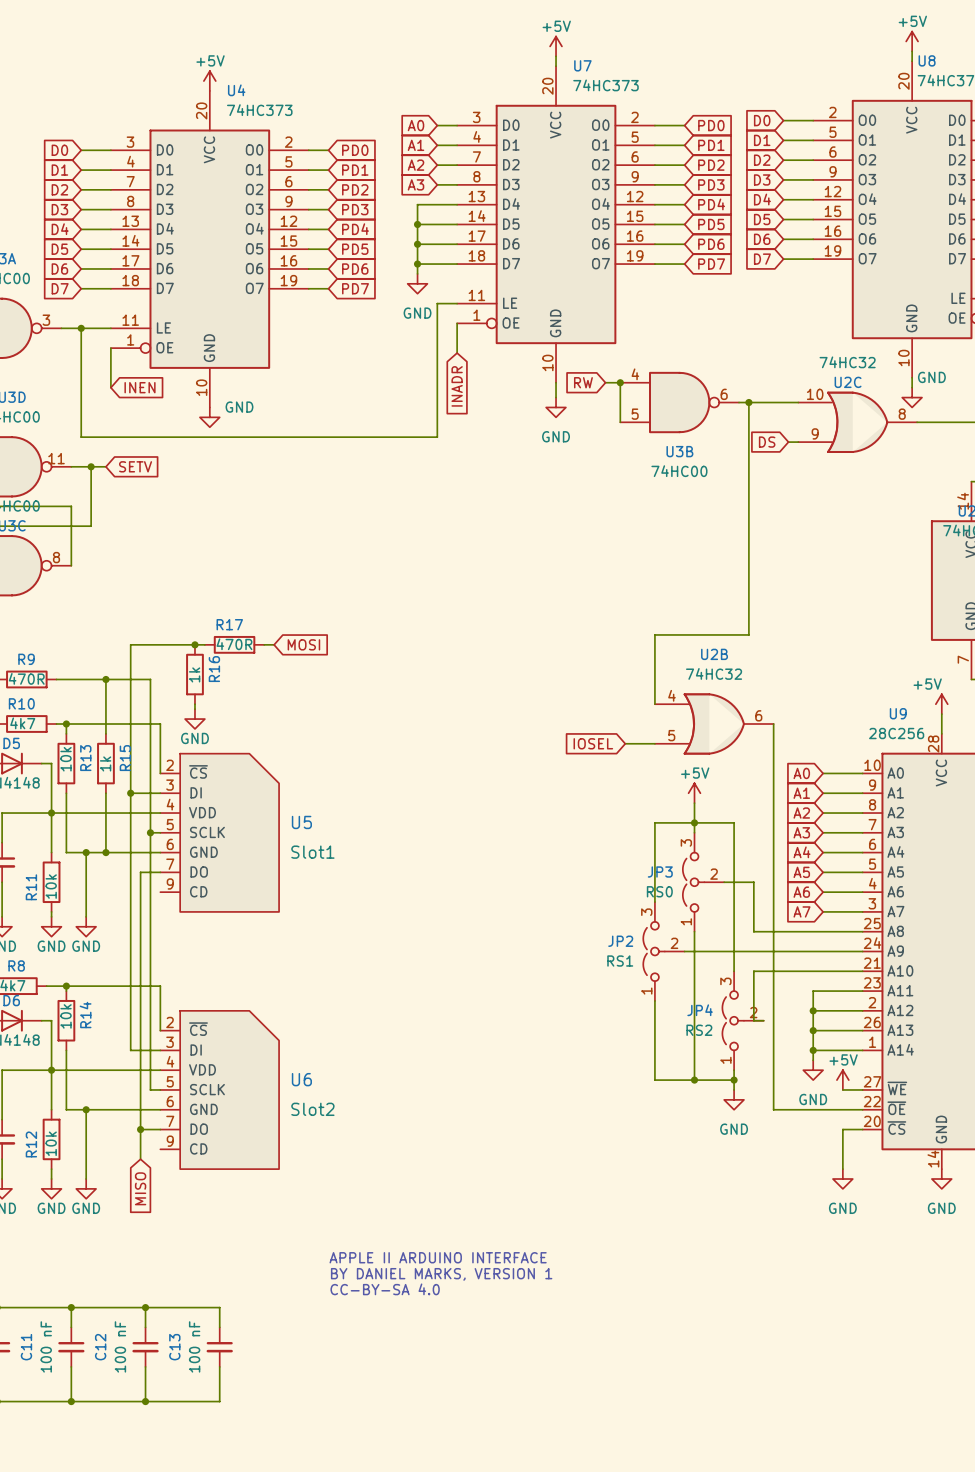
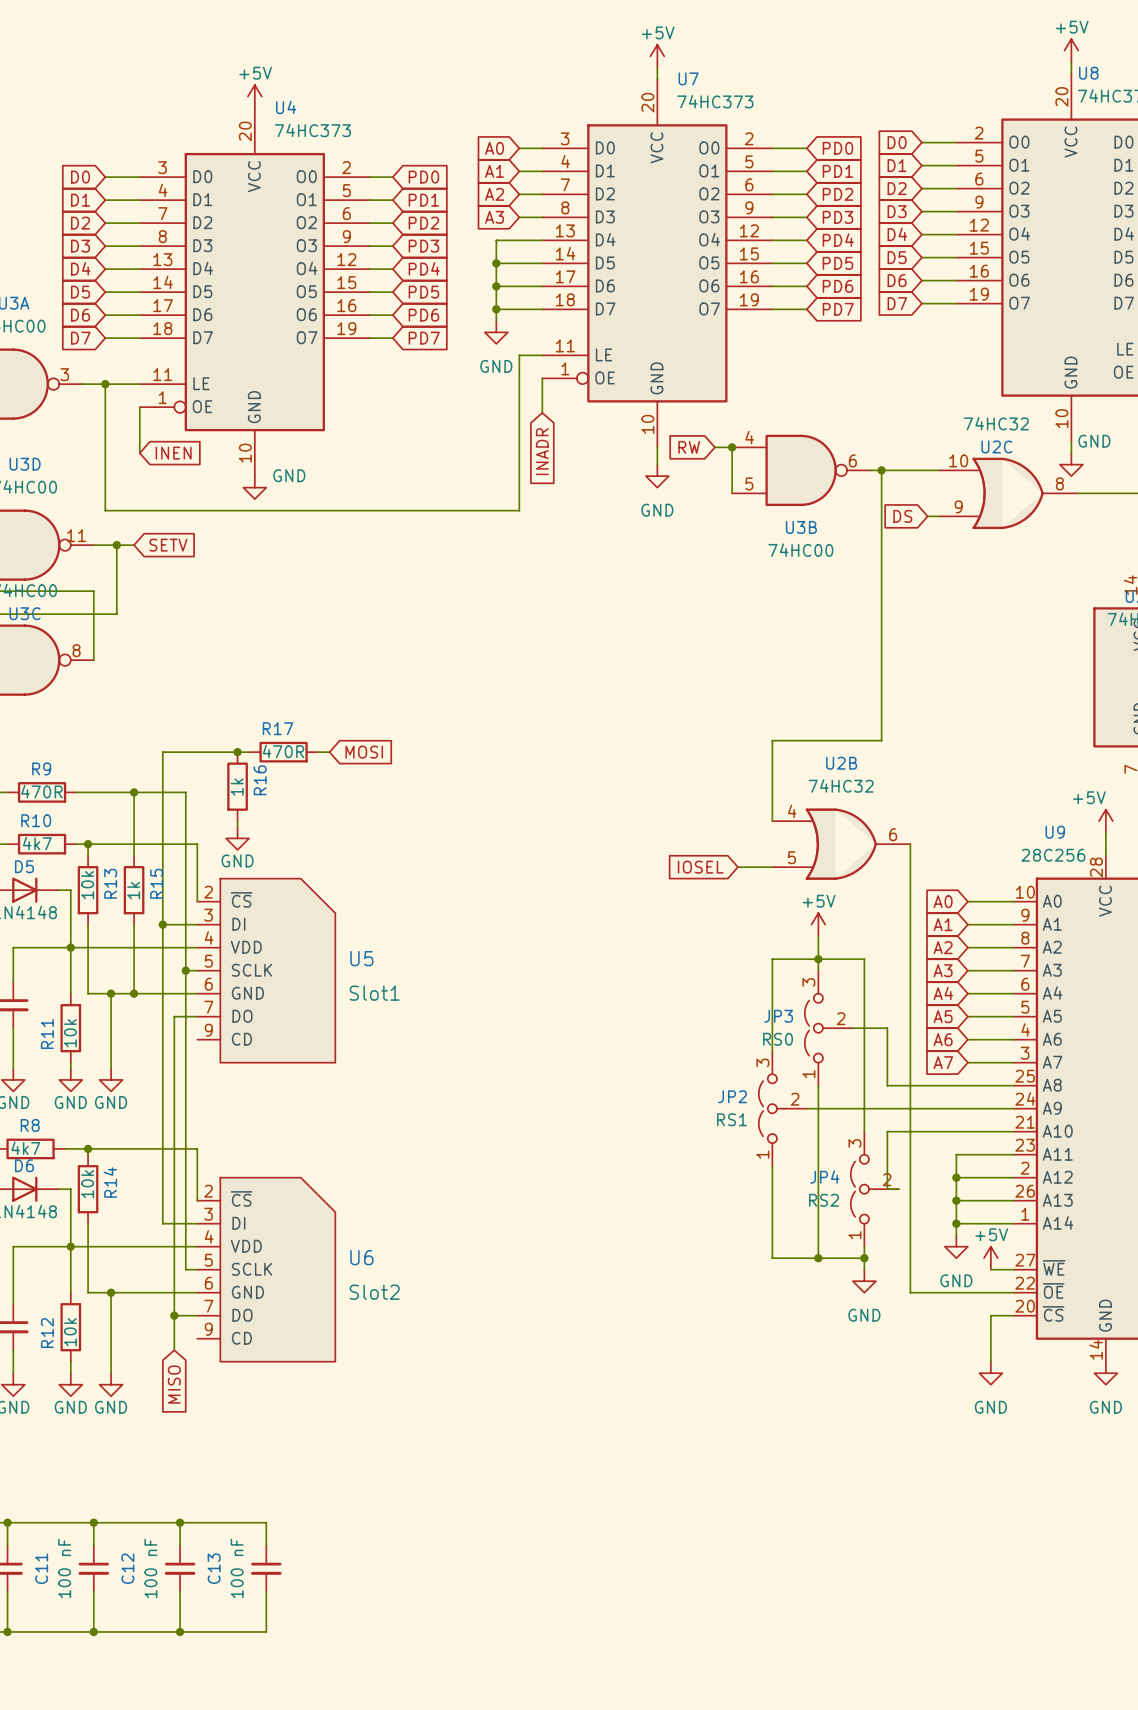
text: APPLE II ARDUINO INTERFACE (438, 1257) -> none
text: BY DANIEL MARKS, VERSION 1 (441, 1274) -> none
text: CC-BY-SA 4.0 (385, 1289) -> none

